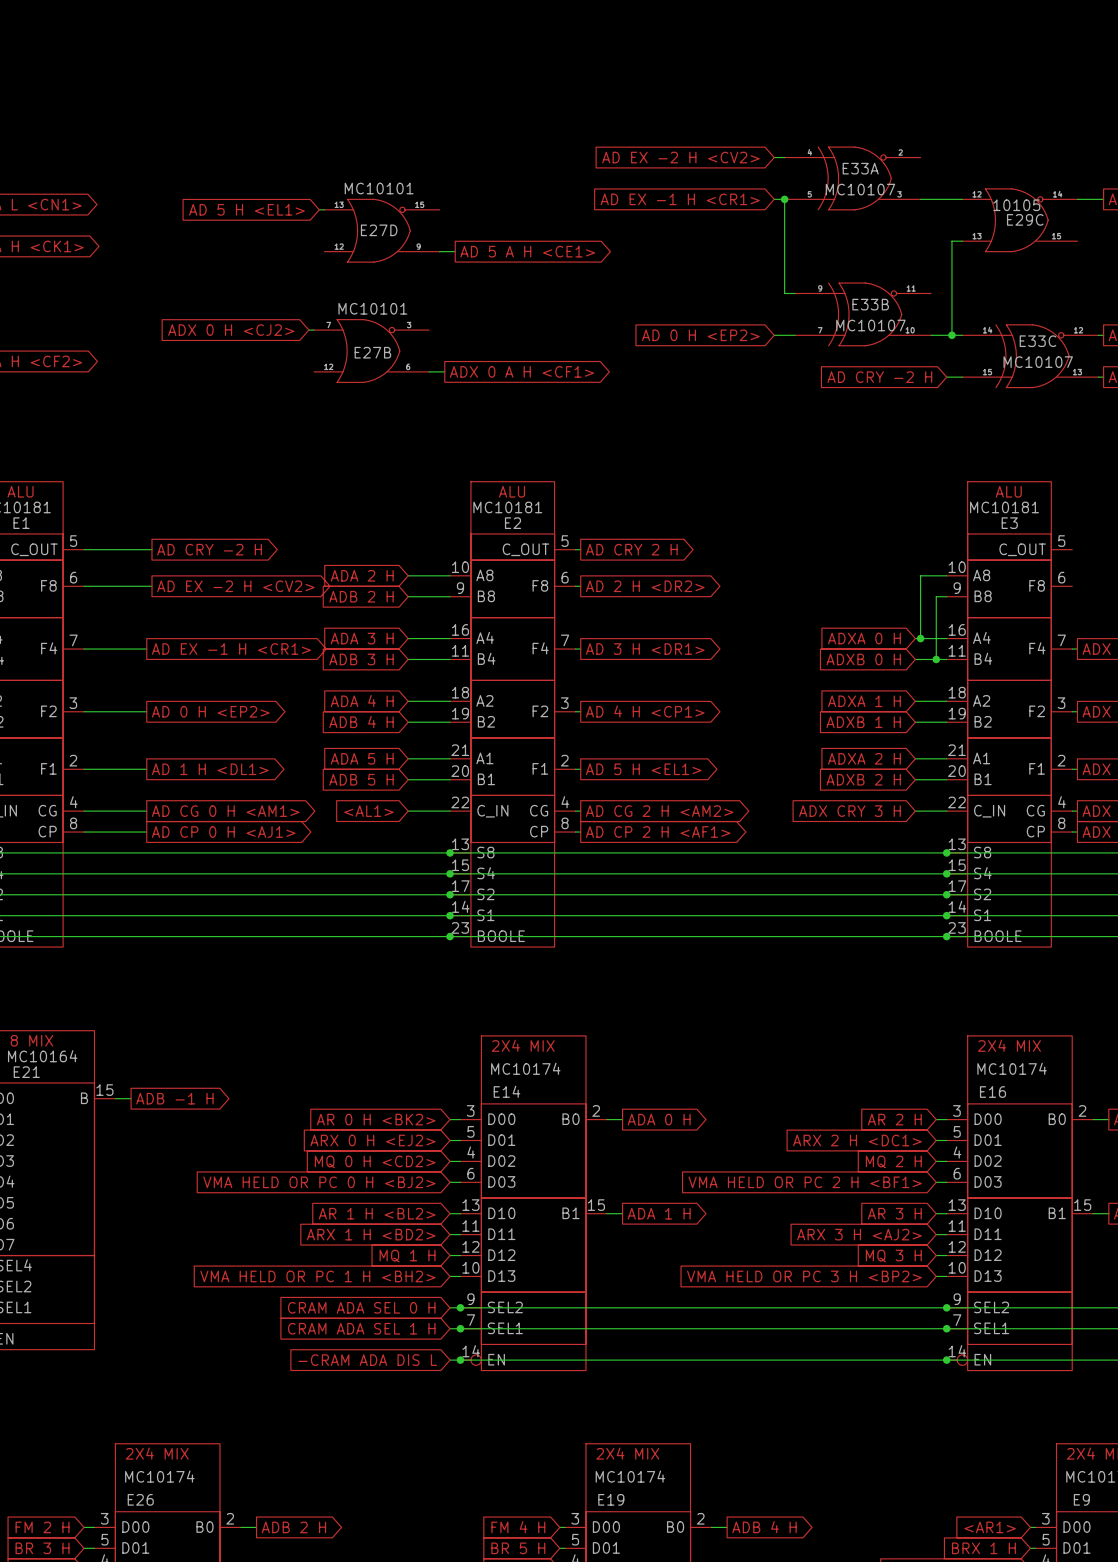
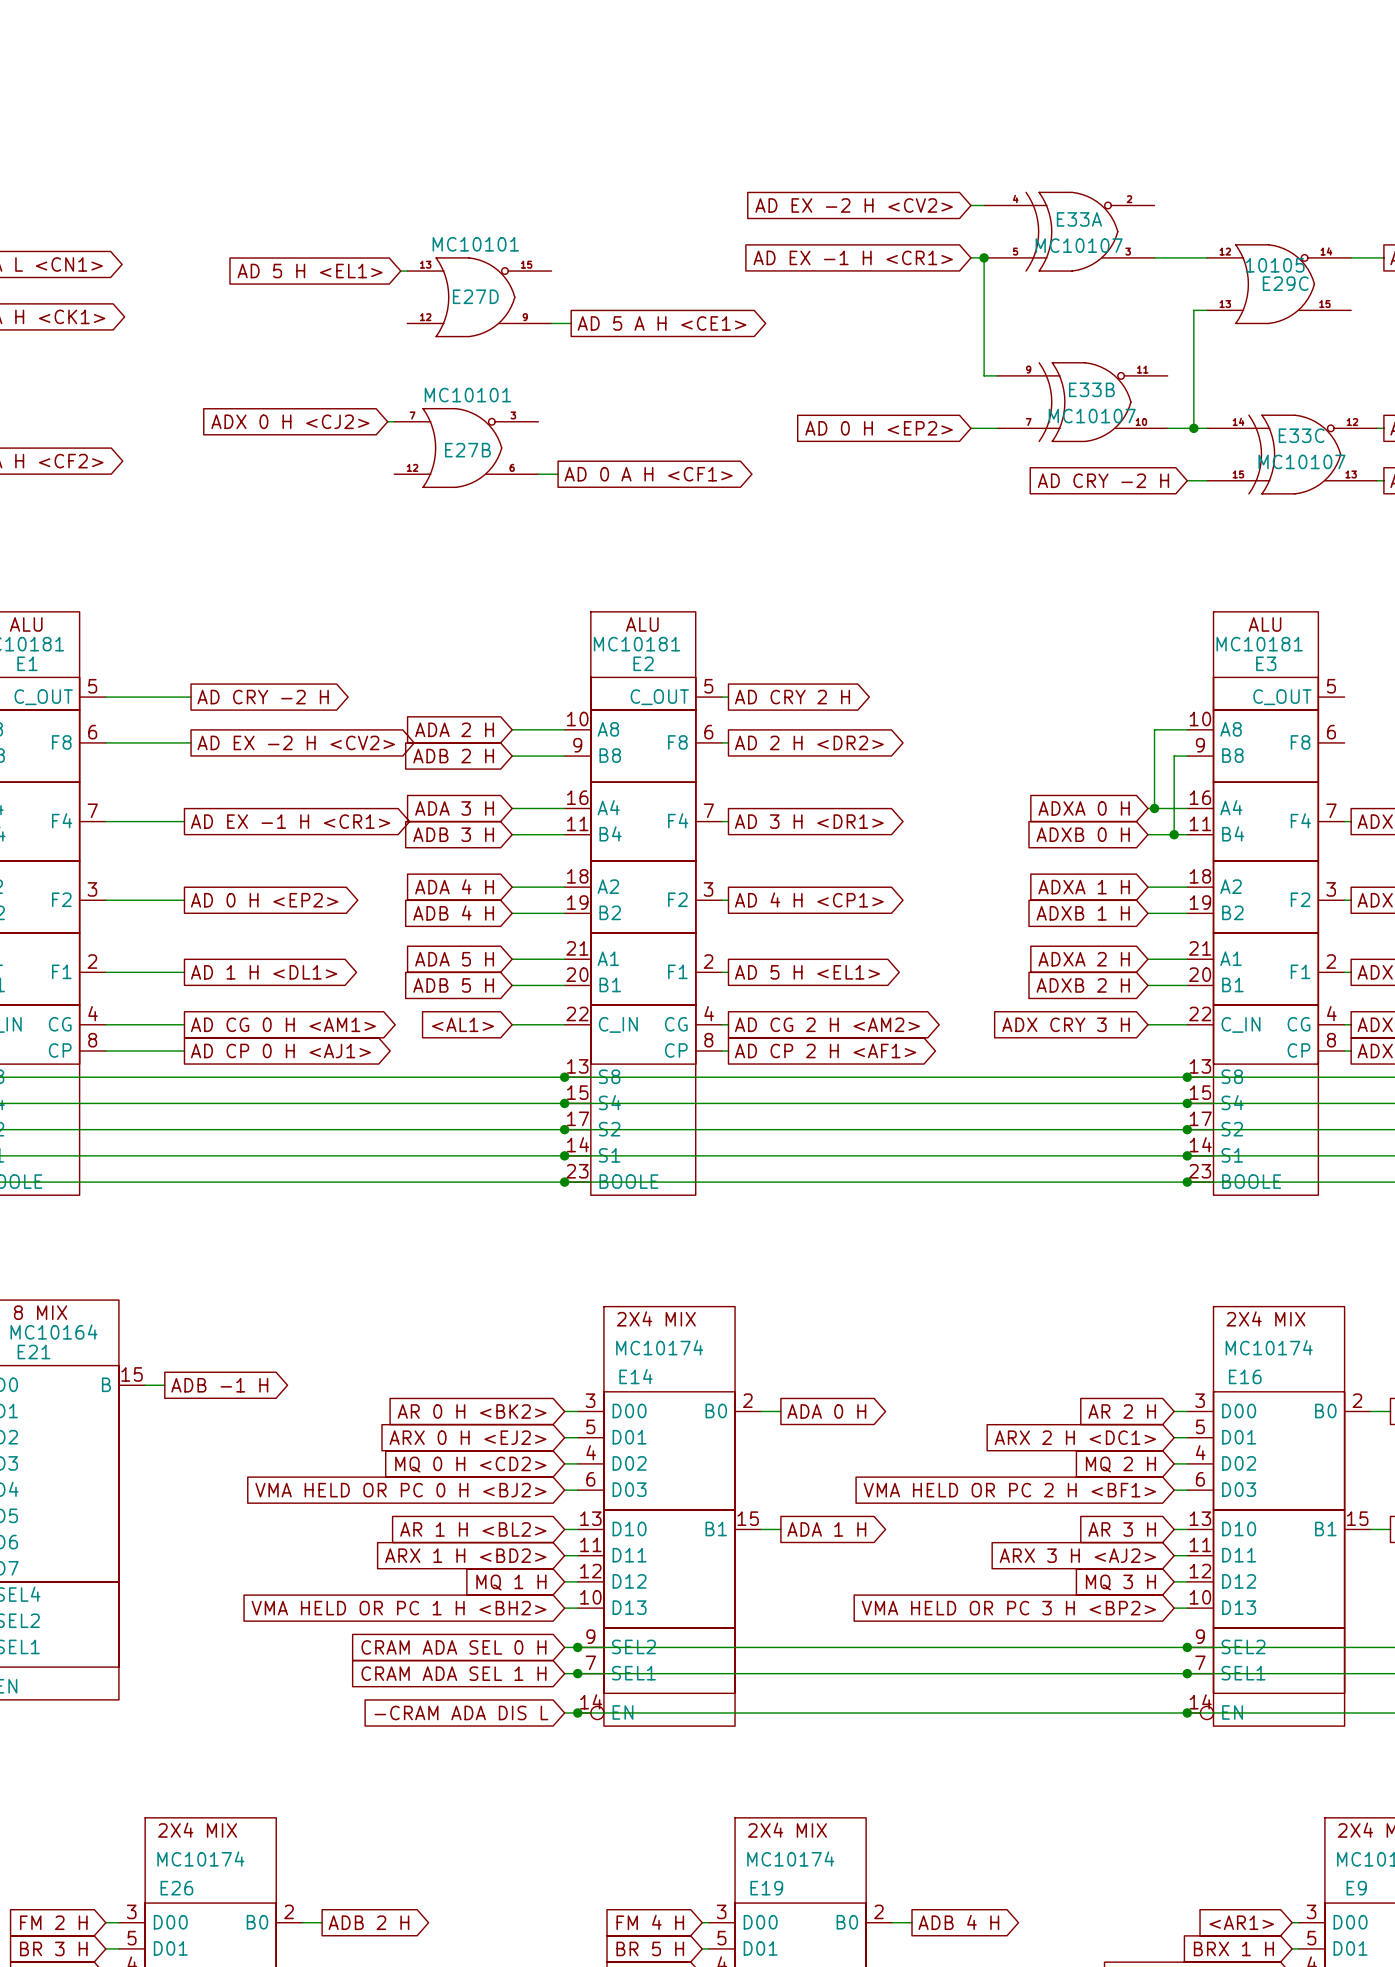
global label: ADX 0 A H <CF1> (521, 371) -> AD 0 A H <CF1> (648, 474)

